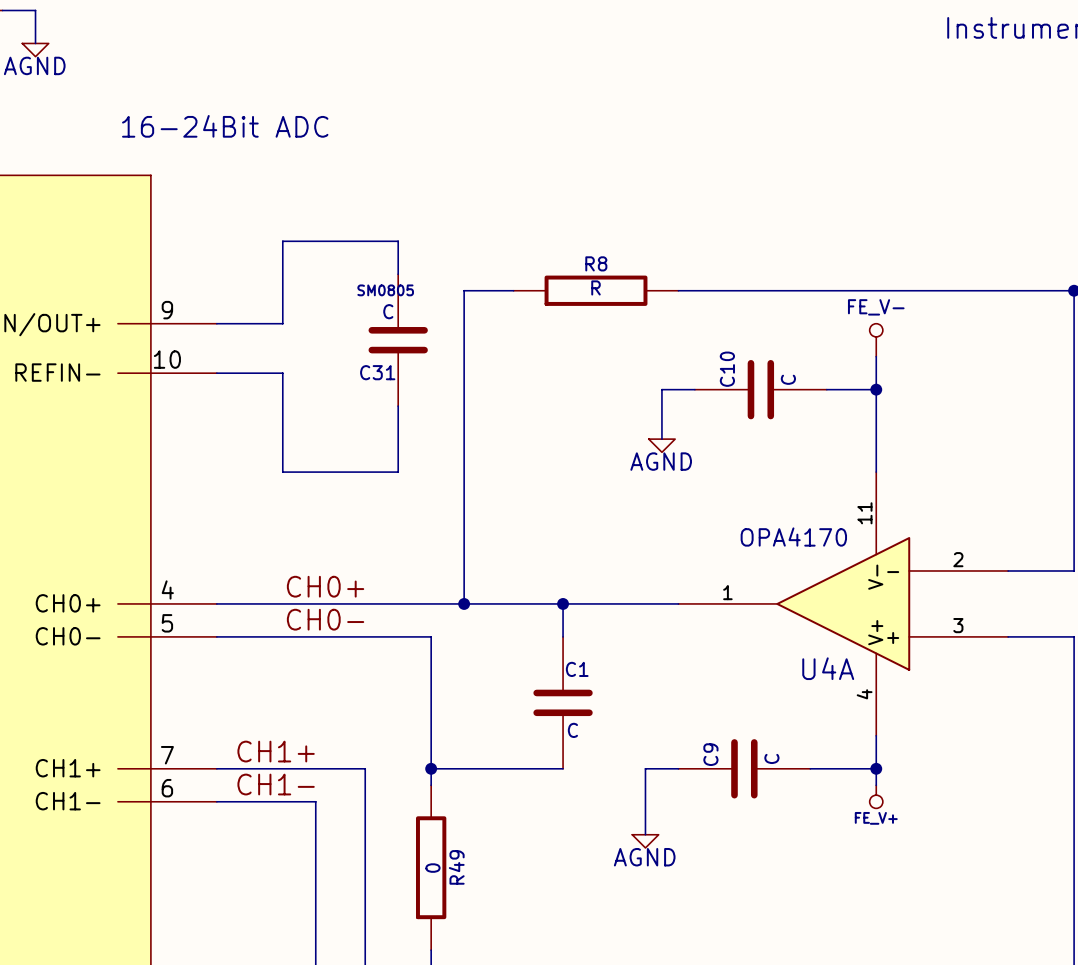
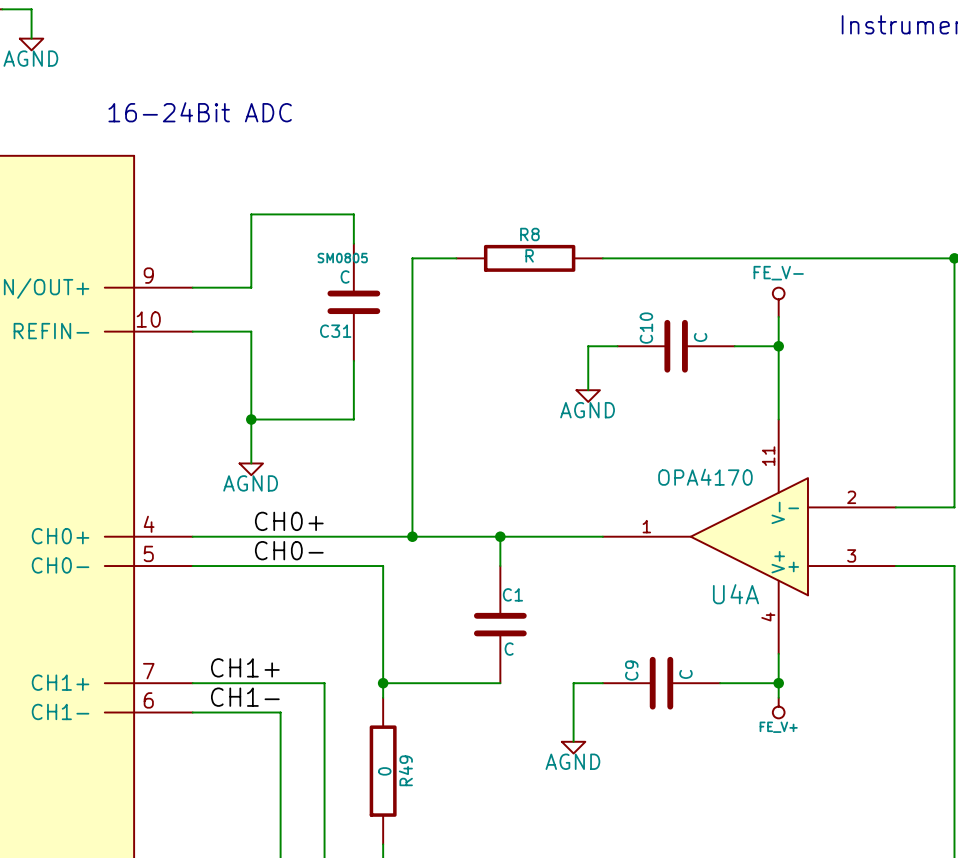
wire: none -> (251, 419) (251, 463)
junction: none -> (251, 419)
power symbol: none -> AGND (251, 469)

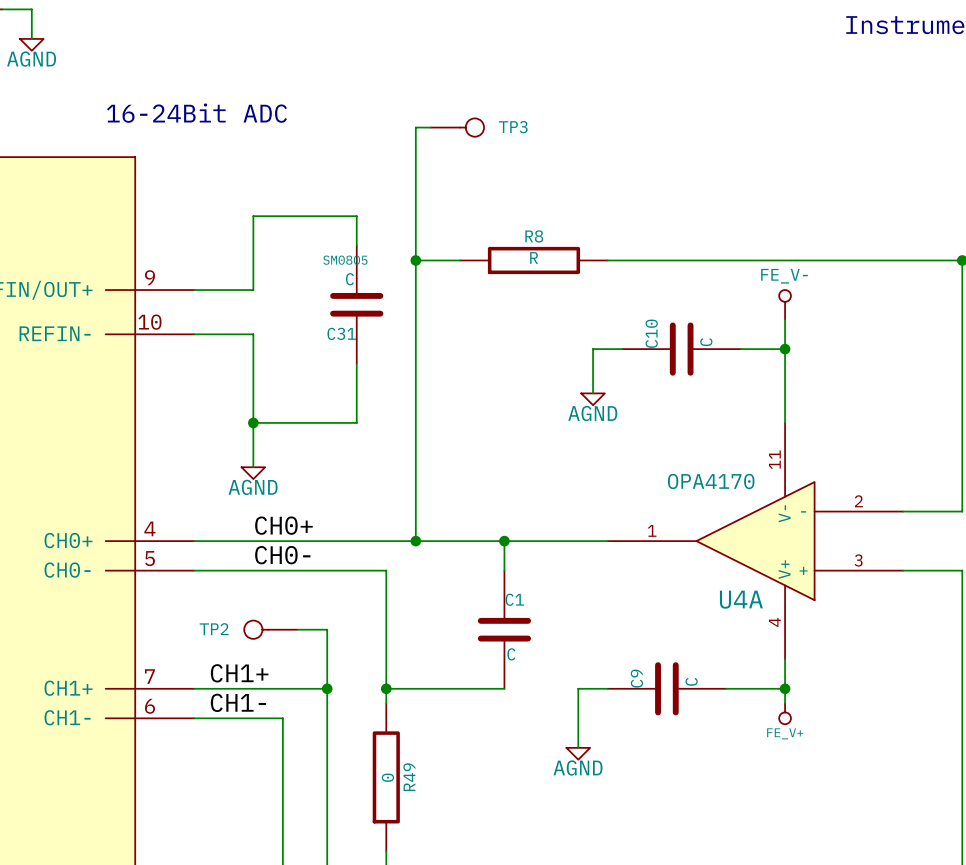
wire: none -> (430, 127) (415, 127) (415, 260)
TP3: none -> (457, 127)
junction: none -> (415, 260)
TP2: none -> (270, 629)
wire: none -> (297, 629) (327, 629) (327, 688)
junction: none -> (327, 688)

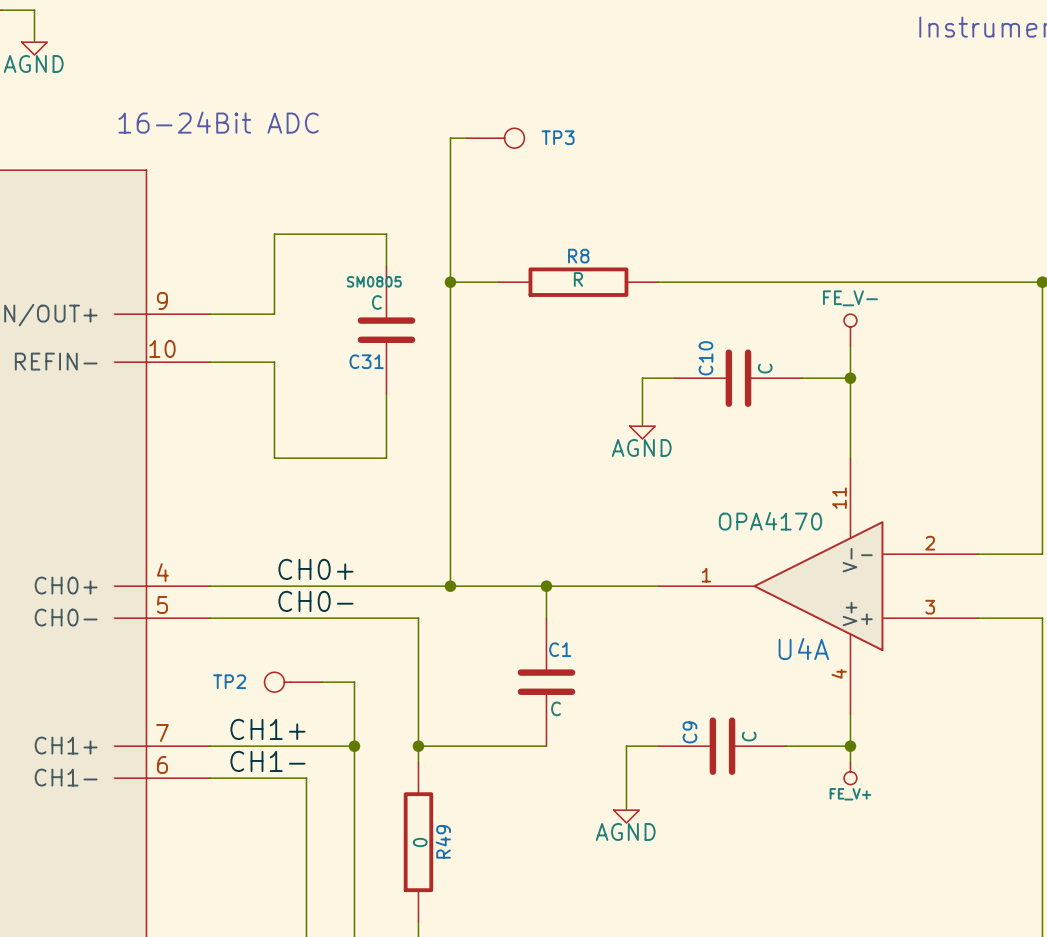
wire: (253, 422) (253, 467) -> none
junction: (253, 422) -> none
power symbol: AGND (253, 473) -> none

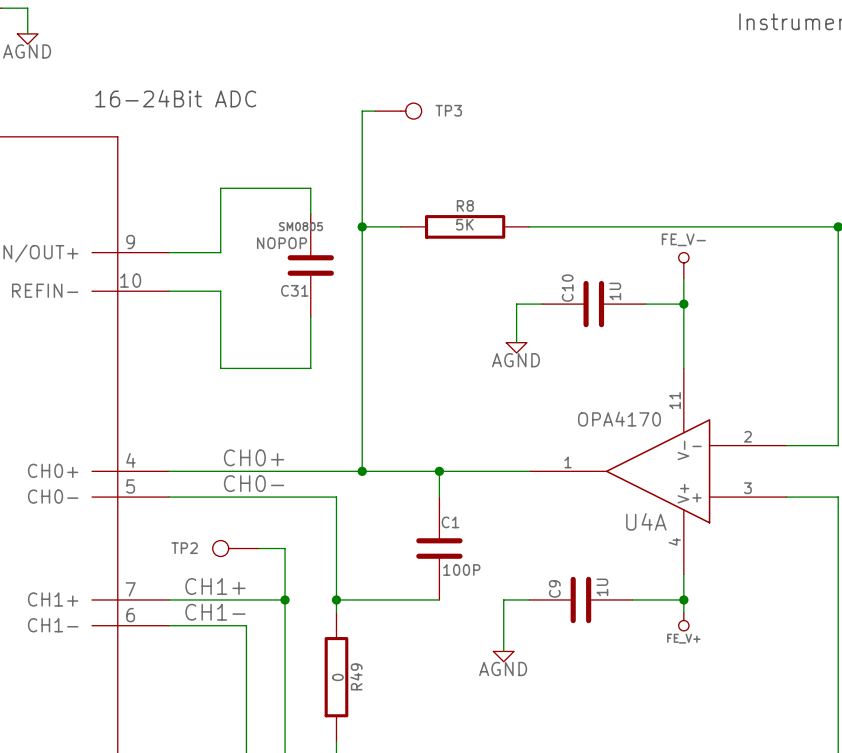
R8 value: R (578, 279) -> 5K (464, 224)
C31 value: C (376, 302) -> NOPOP (281, 243)
C10 value: C (765, 368) -> 1U (615, 291)
C1 value: C (556, 708) -> 100P (461, 570)
C9 value: C (749, 736) -> 1U (602, 587)

